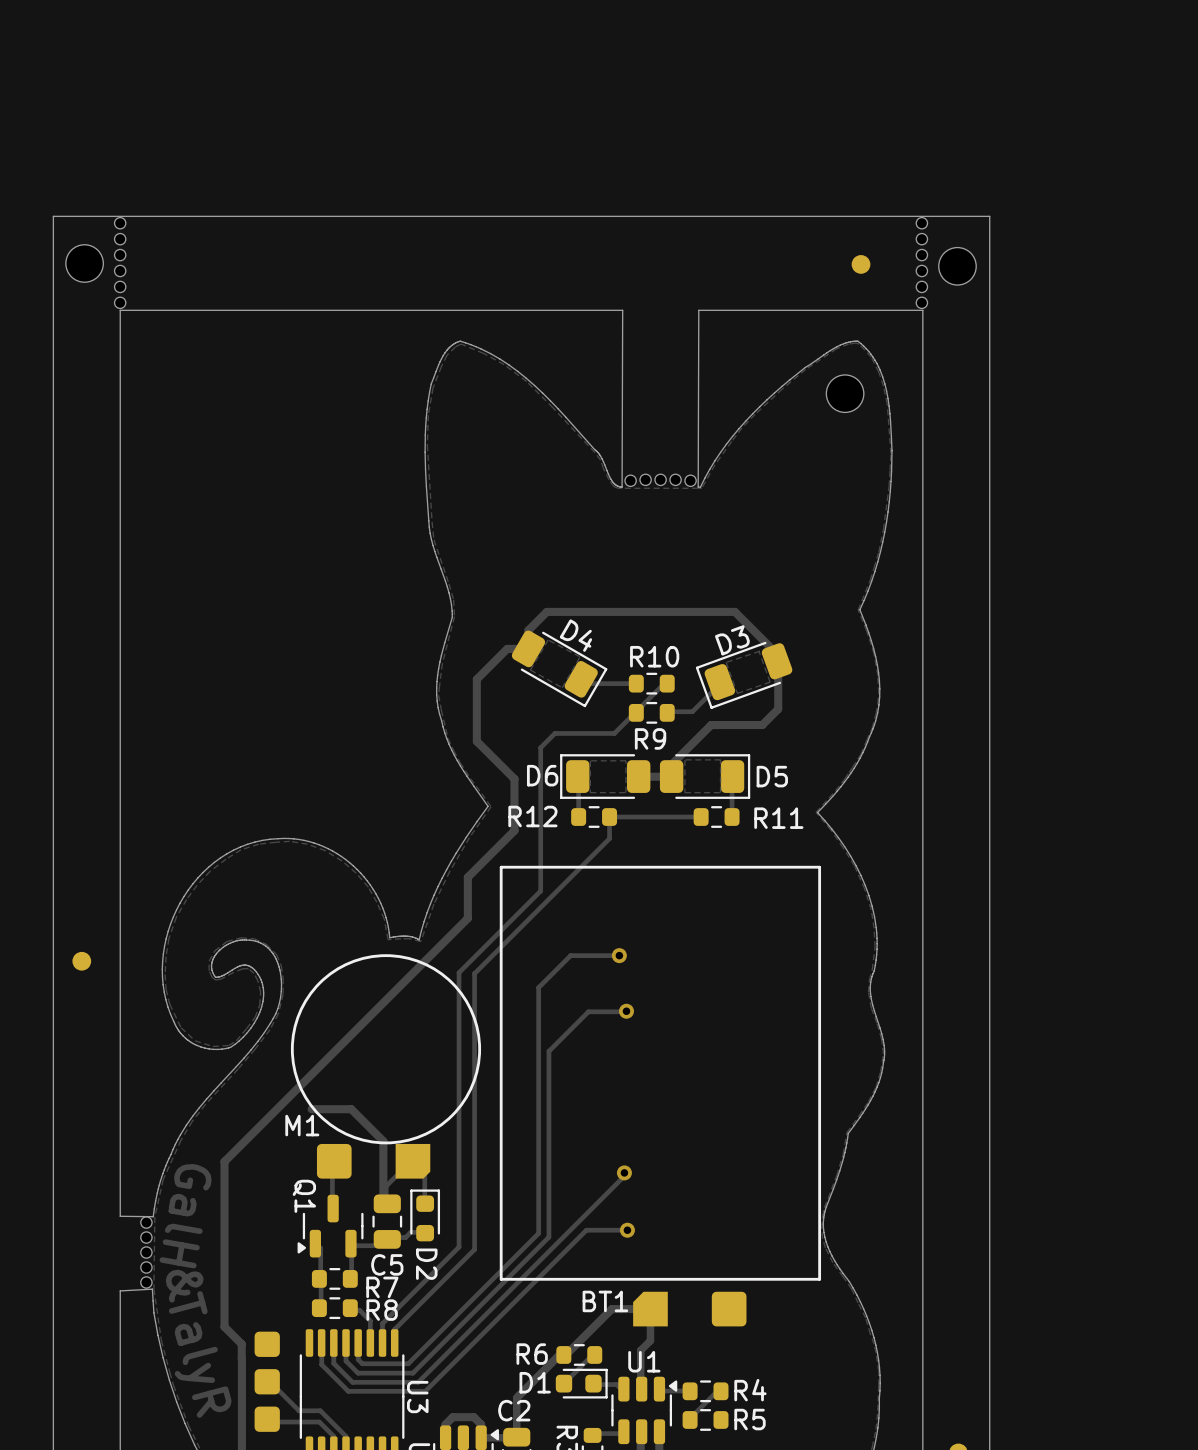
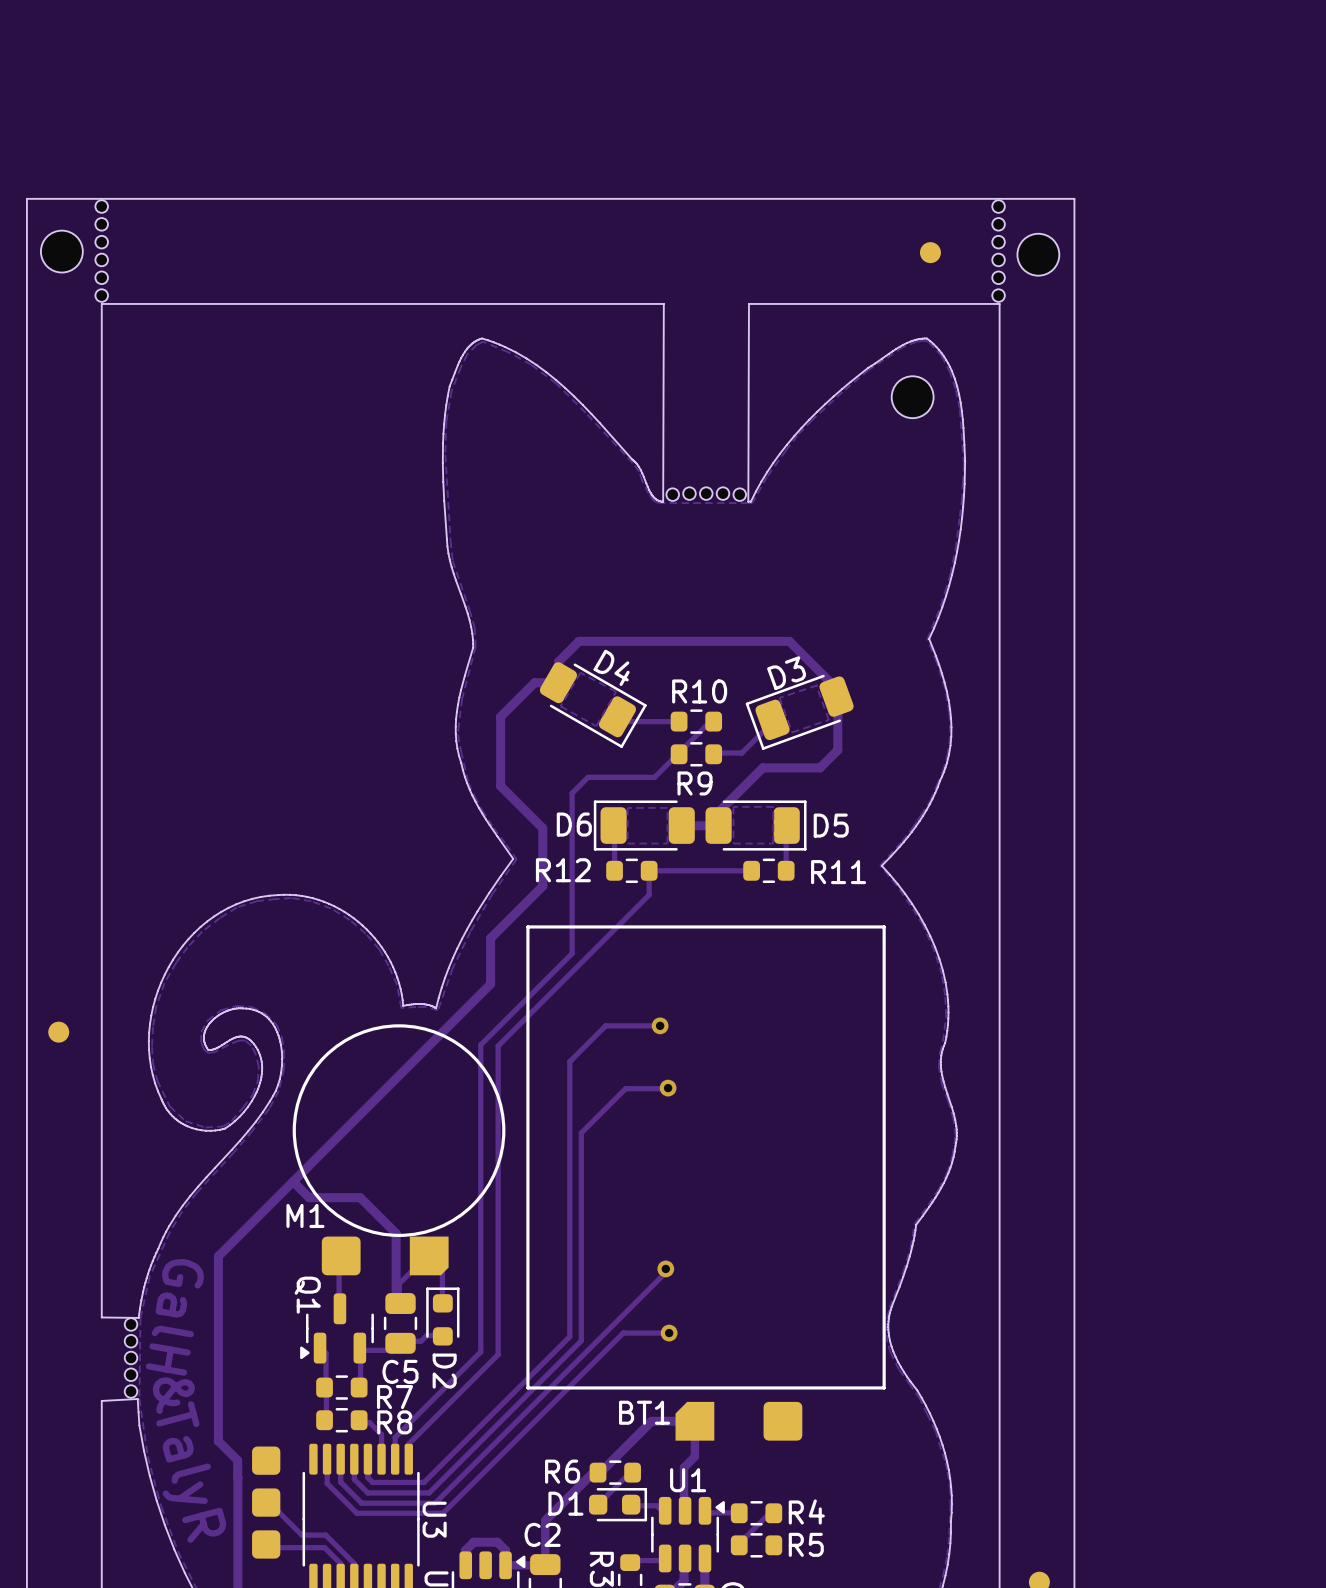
track: none -> (293, 1181) (309, 1197) (315, 1197)

